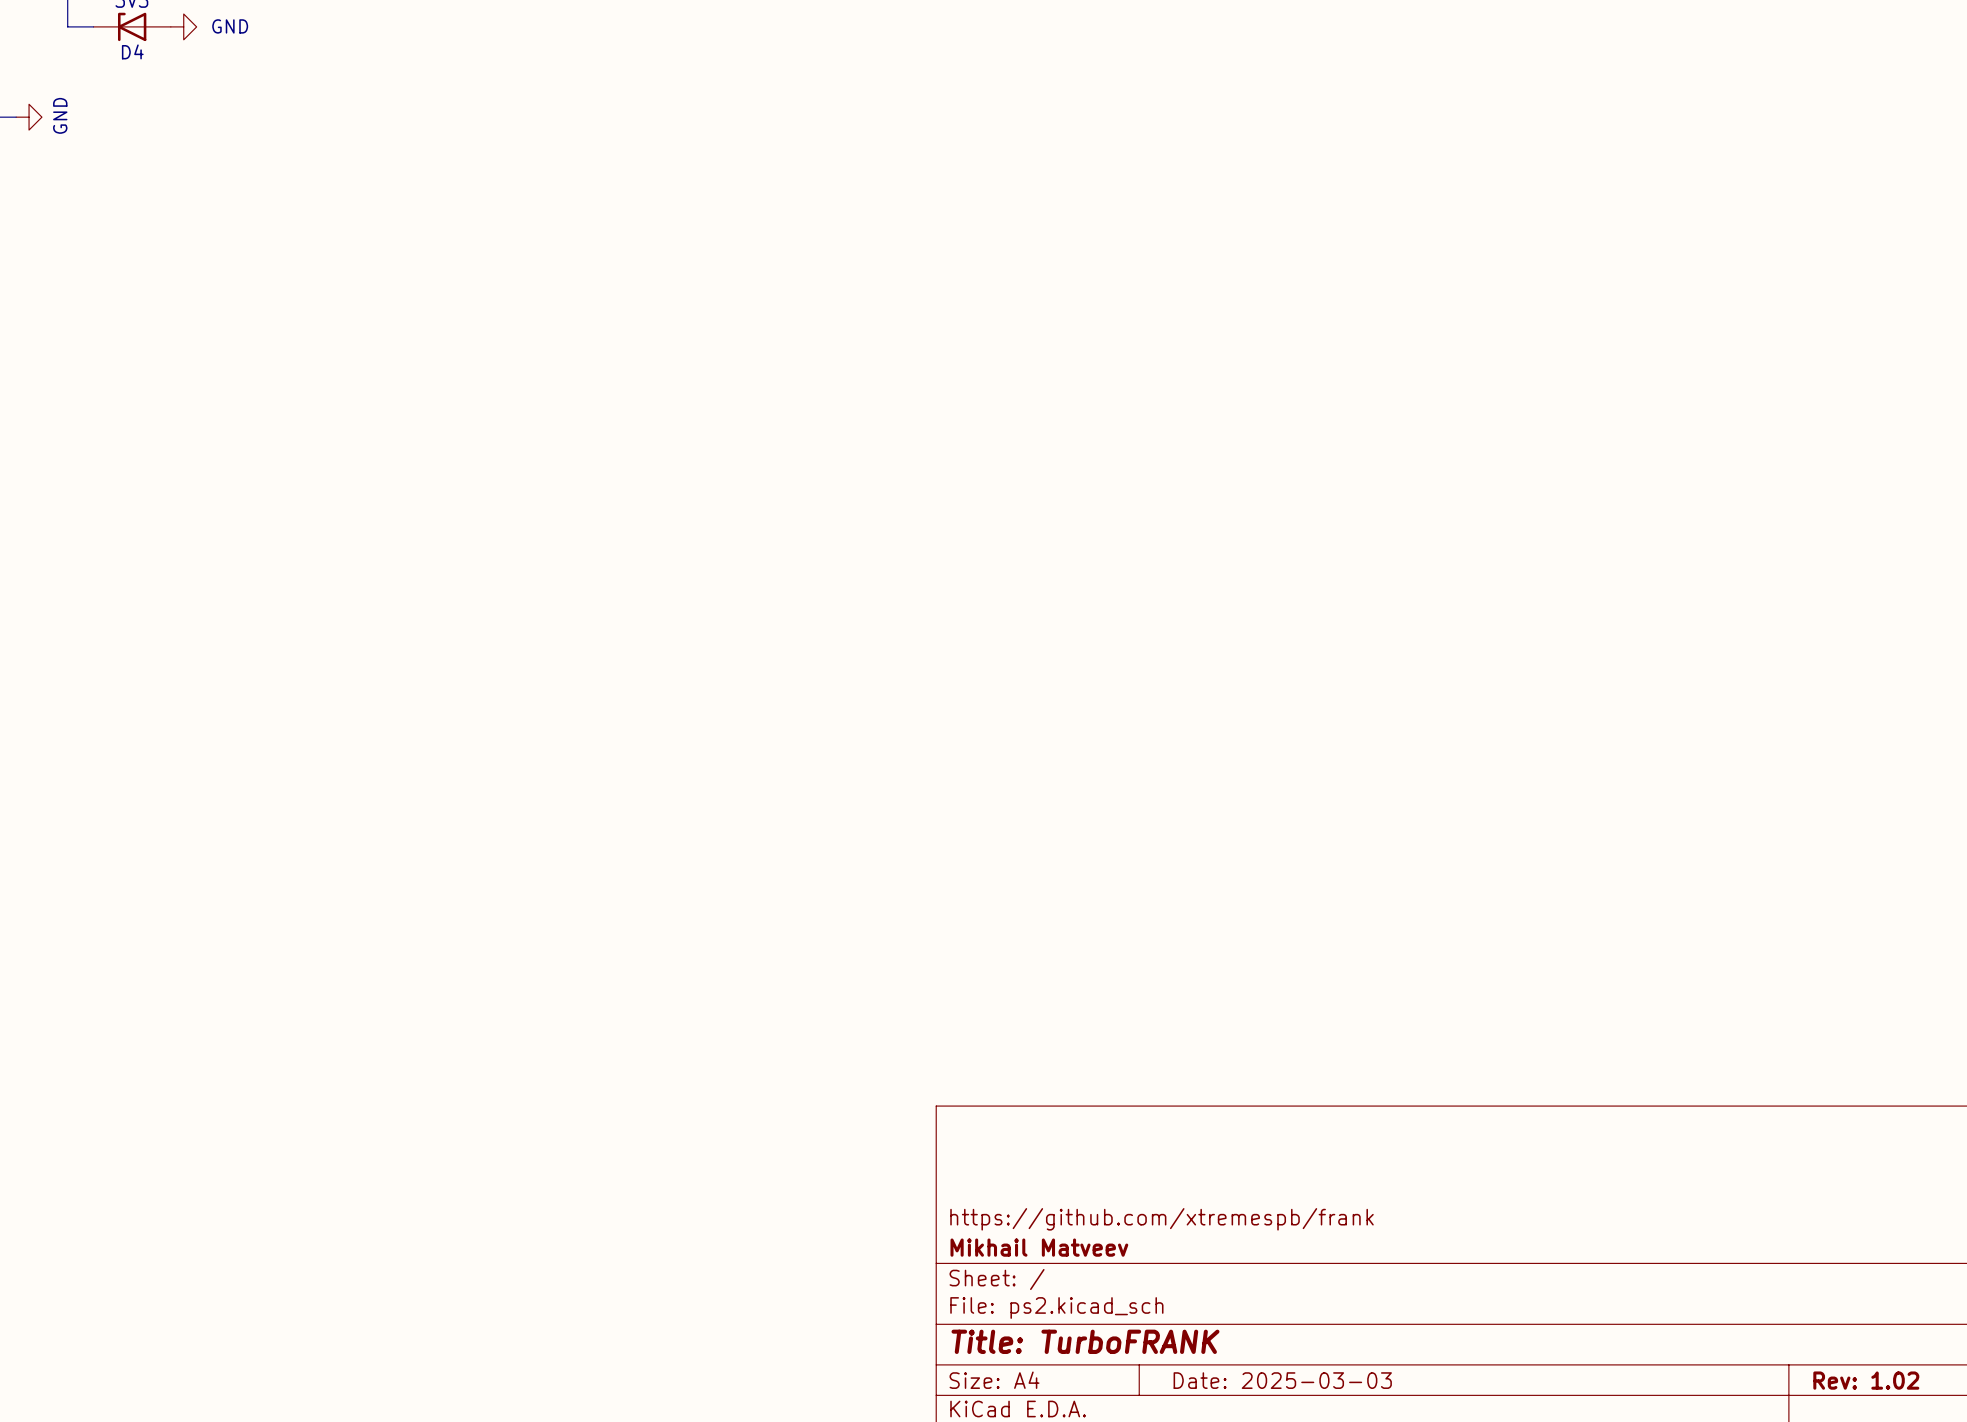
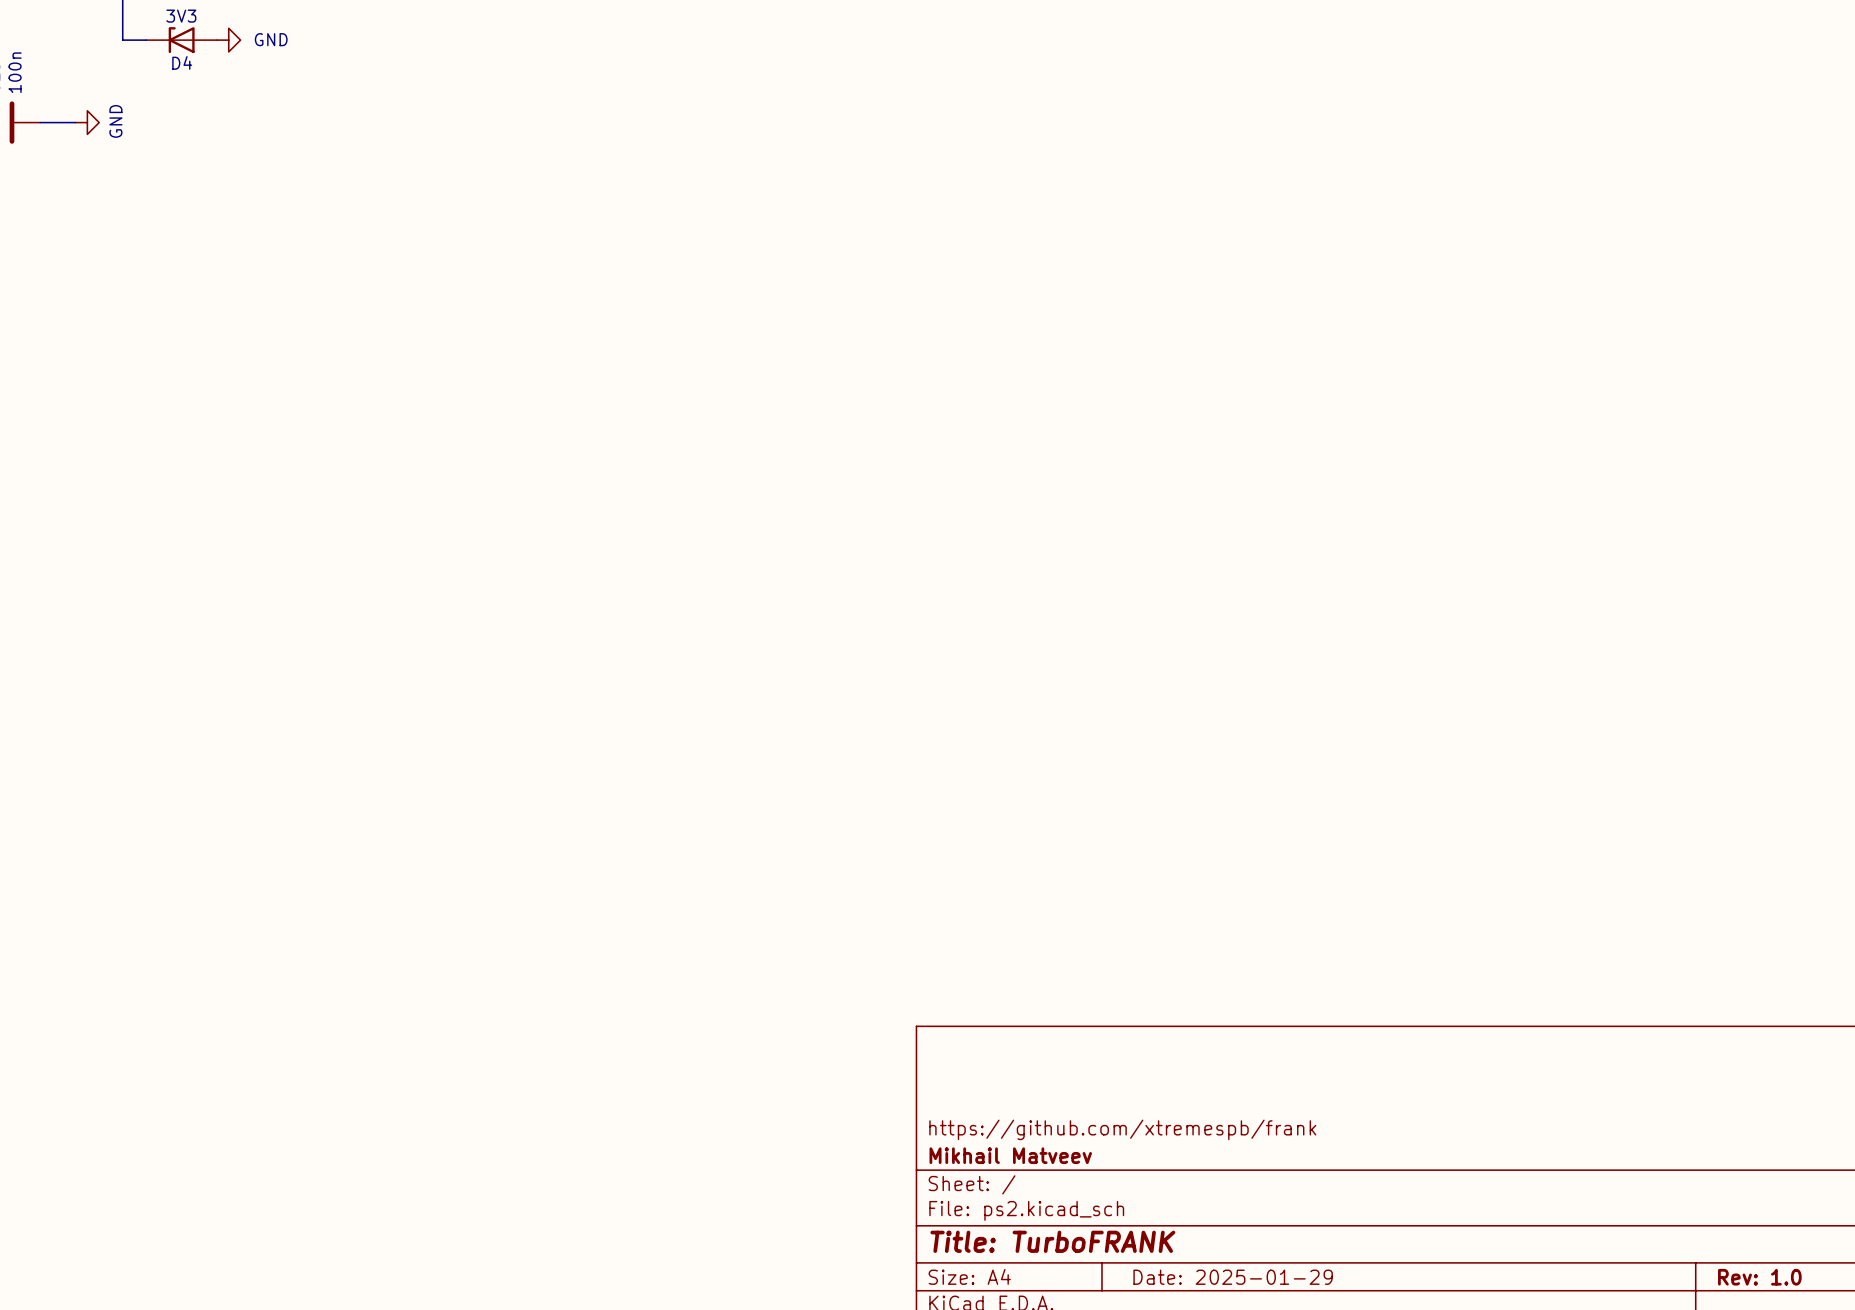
title block: Date: 2025-03-03 (1282, 1380) -> Date: 2025-01-29 (1233, 1277)
title block: Rev: 1.02 (1866, 1380) -> Rev: 1.0 (1759, 1277)

